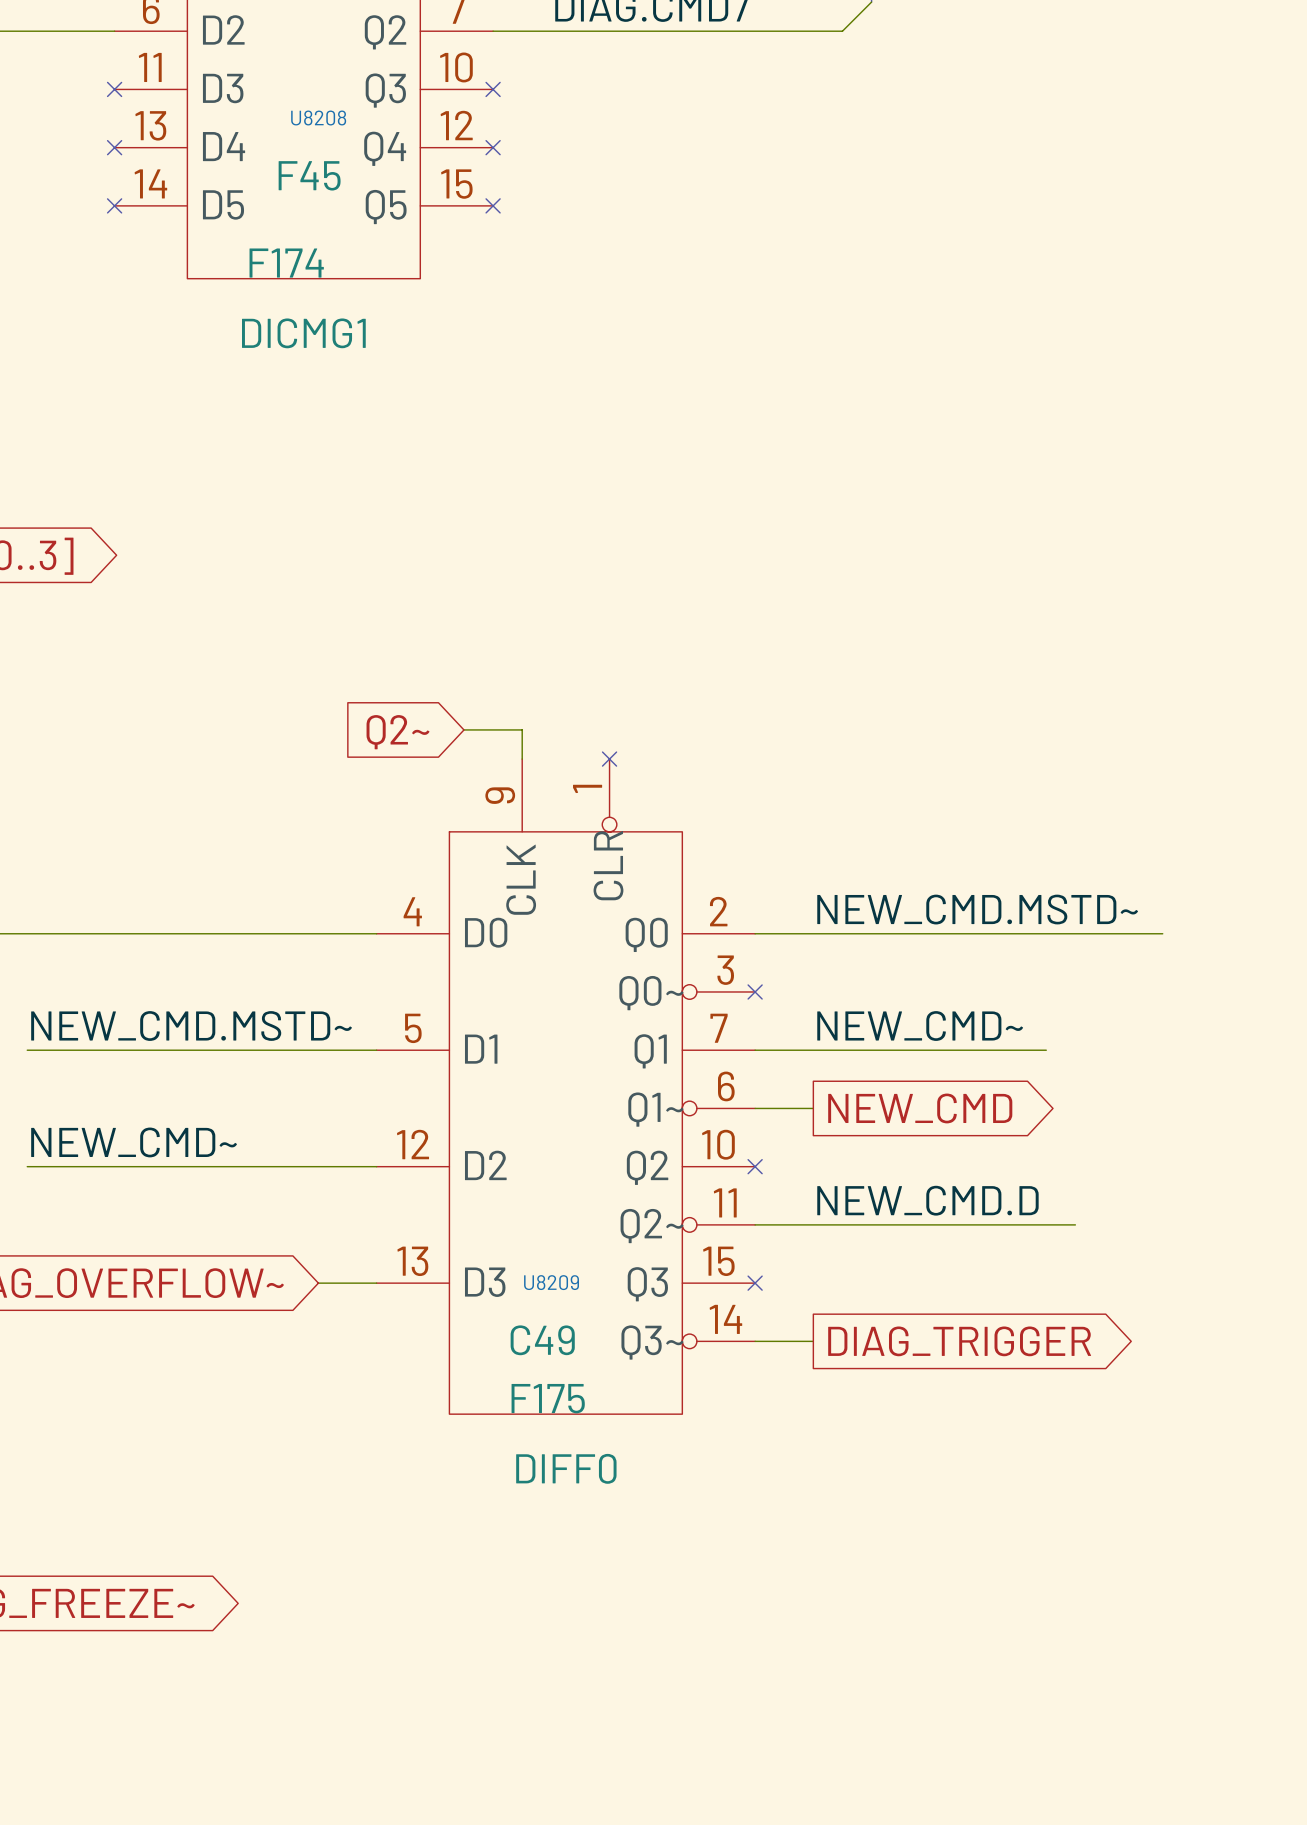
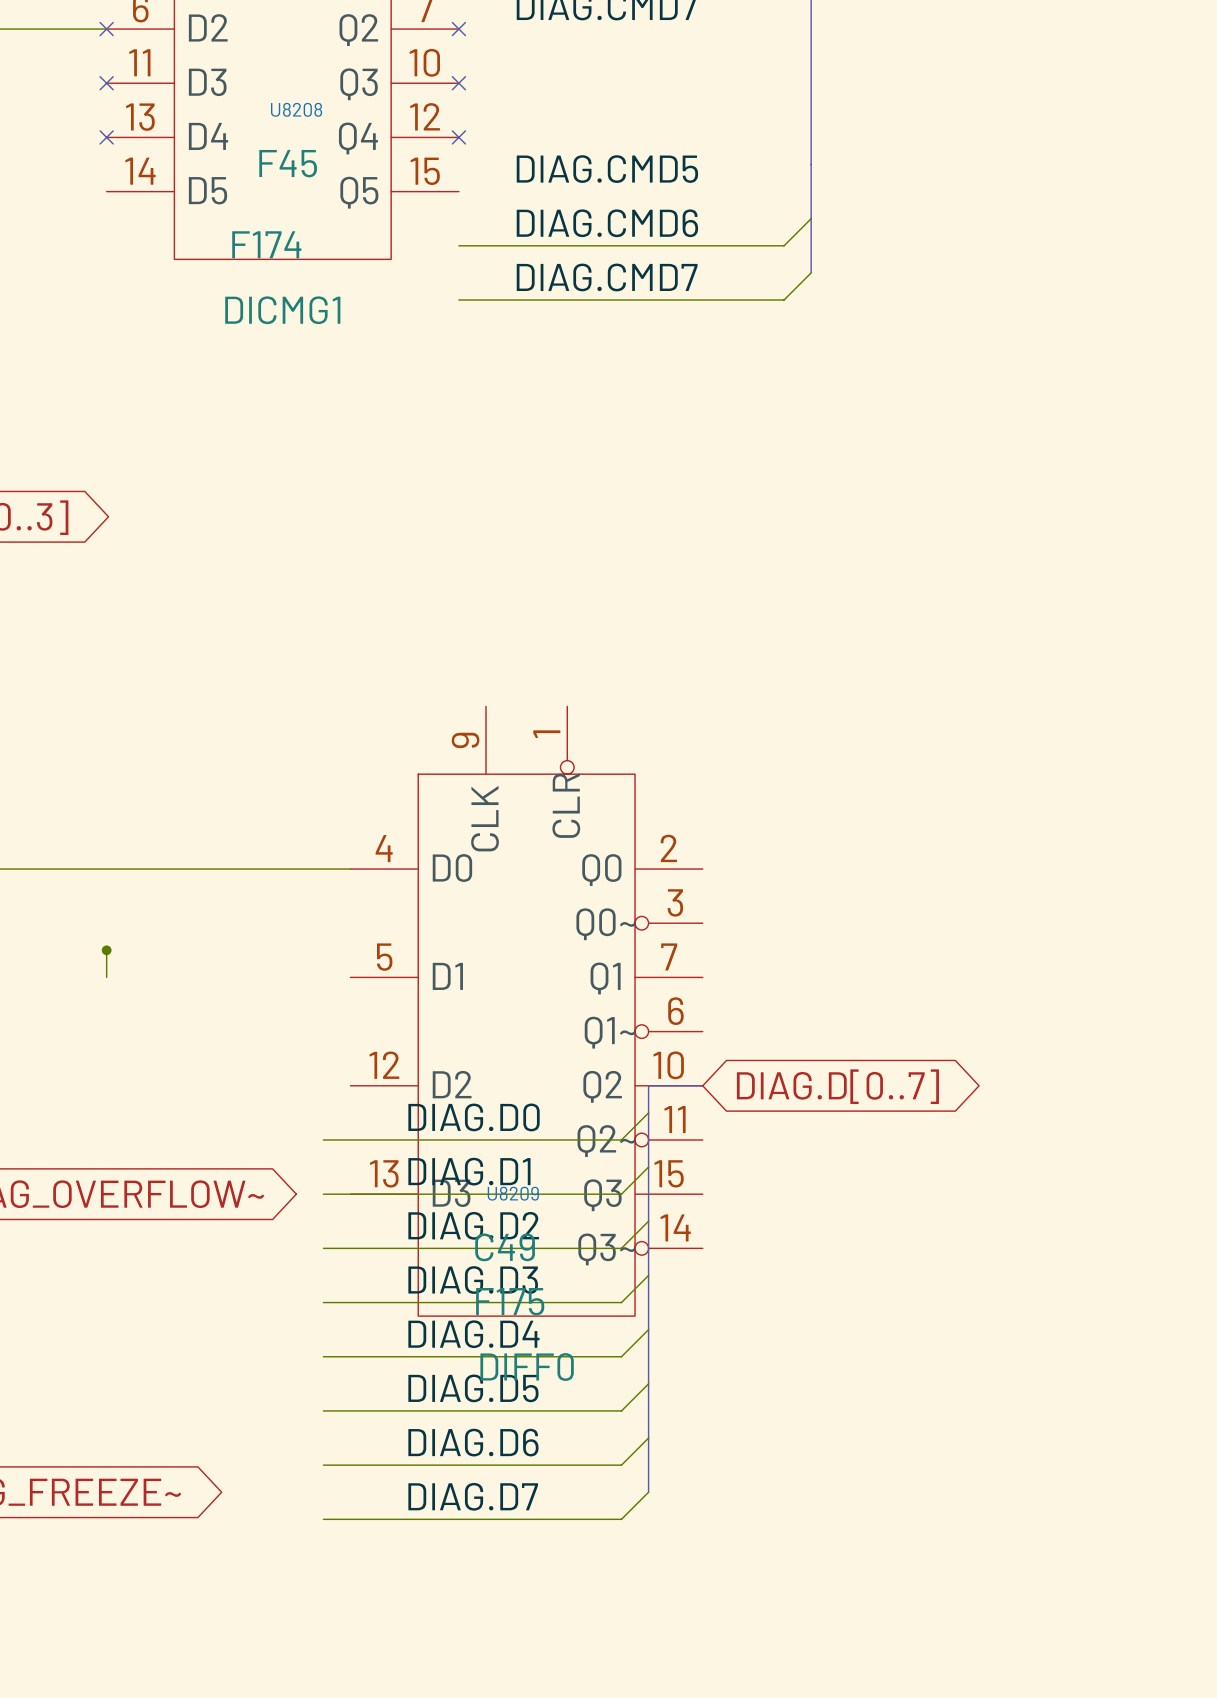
wire: (871, 2) (842, 31) (493, 31) -> (811, 218) (784, 245) (458, 245)
bus: none -> (811, 1) (811, 272)
no-connect mark: none -> (106, 29)
no-connect mark: none -> (458, 29)
label: none -> DIAG.CMD5 (607, 169)
no-connect mark: (114, 205) -> none
no-connect mark: (493, 205) -> none
label: none -> DIAG.CMD6 (607, 223)
wire: none -> (811, 272) (784, 300) (458, 300)
label: none -> DIAG.CMD7 (607, 277)
wire: (463, 729) (522, 729) (522, 759) -> none
global label: Q2~ (398, 732) -> none
no-connect mark: (609, 759) -> none
label: NEW_CMD.MSTD~ (977, 909) -> none
wire: (755, 933) (1162, 933) -> none
no-connect mark: (755, 991) -> none
wire: none -> (106, 950) (106, 977)
junction: none -> (106, 950)
label: NEW_CMD.MSTD~ (191, 1026) -> none
label: NEW_CMD~ (920, 1026) -> none
wire: (27, 1050) (376, 1050) -> none
wire: (755, 1050) (1046, 1050) -> none
wire: (755, 1108) (813, 1108) -> none
global label: NEW_CMD (920, 1108) -> none
label: NEW_CMD~ (134, 1142) -> none
wire: (27, 1166) (376, 1166) -> none
bus: none -> (702, 1085) (648, 1085) (648, 1492)
no-connect mark: (755, 1166) -> none
global label: none -> DIAG.D[0..7] (837, 1086)
wire: none -> (648, 1112) (621, 1139) (323, 1139)
label: none -> DIAG.D0 (474, 1117)
label: NEW_CMD.D (927, 1200) -> none
wire: (755, 1224) (1075, 1224) -> none
wire: none -> (648, 1167) (621, 1194) (350, 1194)
label: none -> DIAG.D1 (469, 1171)
wire: (318, 1283) (347, 1283) -> none
no-connect mark: (755, 1283) -> none
wire: none -> (648, 1221) (621, 1248) (323, 1248)
label: none -> DIAG.D2 (473, 1225)
wire: (755, 1341) (813, 1341) -> none
global label: DIAG_TRIGGER (959, 1341) -> none
wire: none -> (648, 1275) (621, 1302) (323, 1302)
label: none -> DIAG.D3 (473, 1280)
wire: none -> (648, 1329) (621, 1356) (323, 1356)
label: none -> DIAG.D4 (473, 1334)
wire: none -> (648, 1383) (621, 1410) (323, 1410)
label: none -> DIAG.D5 (473, 1388)
wire: none -> (648, 1438) (621, 1465) (323, 1465)
label: none -> DIAG.D6 (473, 1442)
wire: none -> (648, 1492) (621, 1519) (323, 1519)
label: none -> DIAG.D7 (473, 1496)

